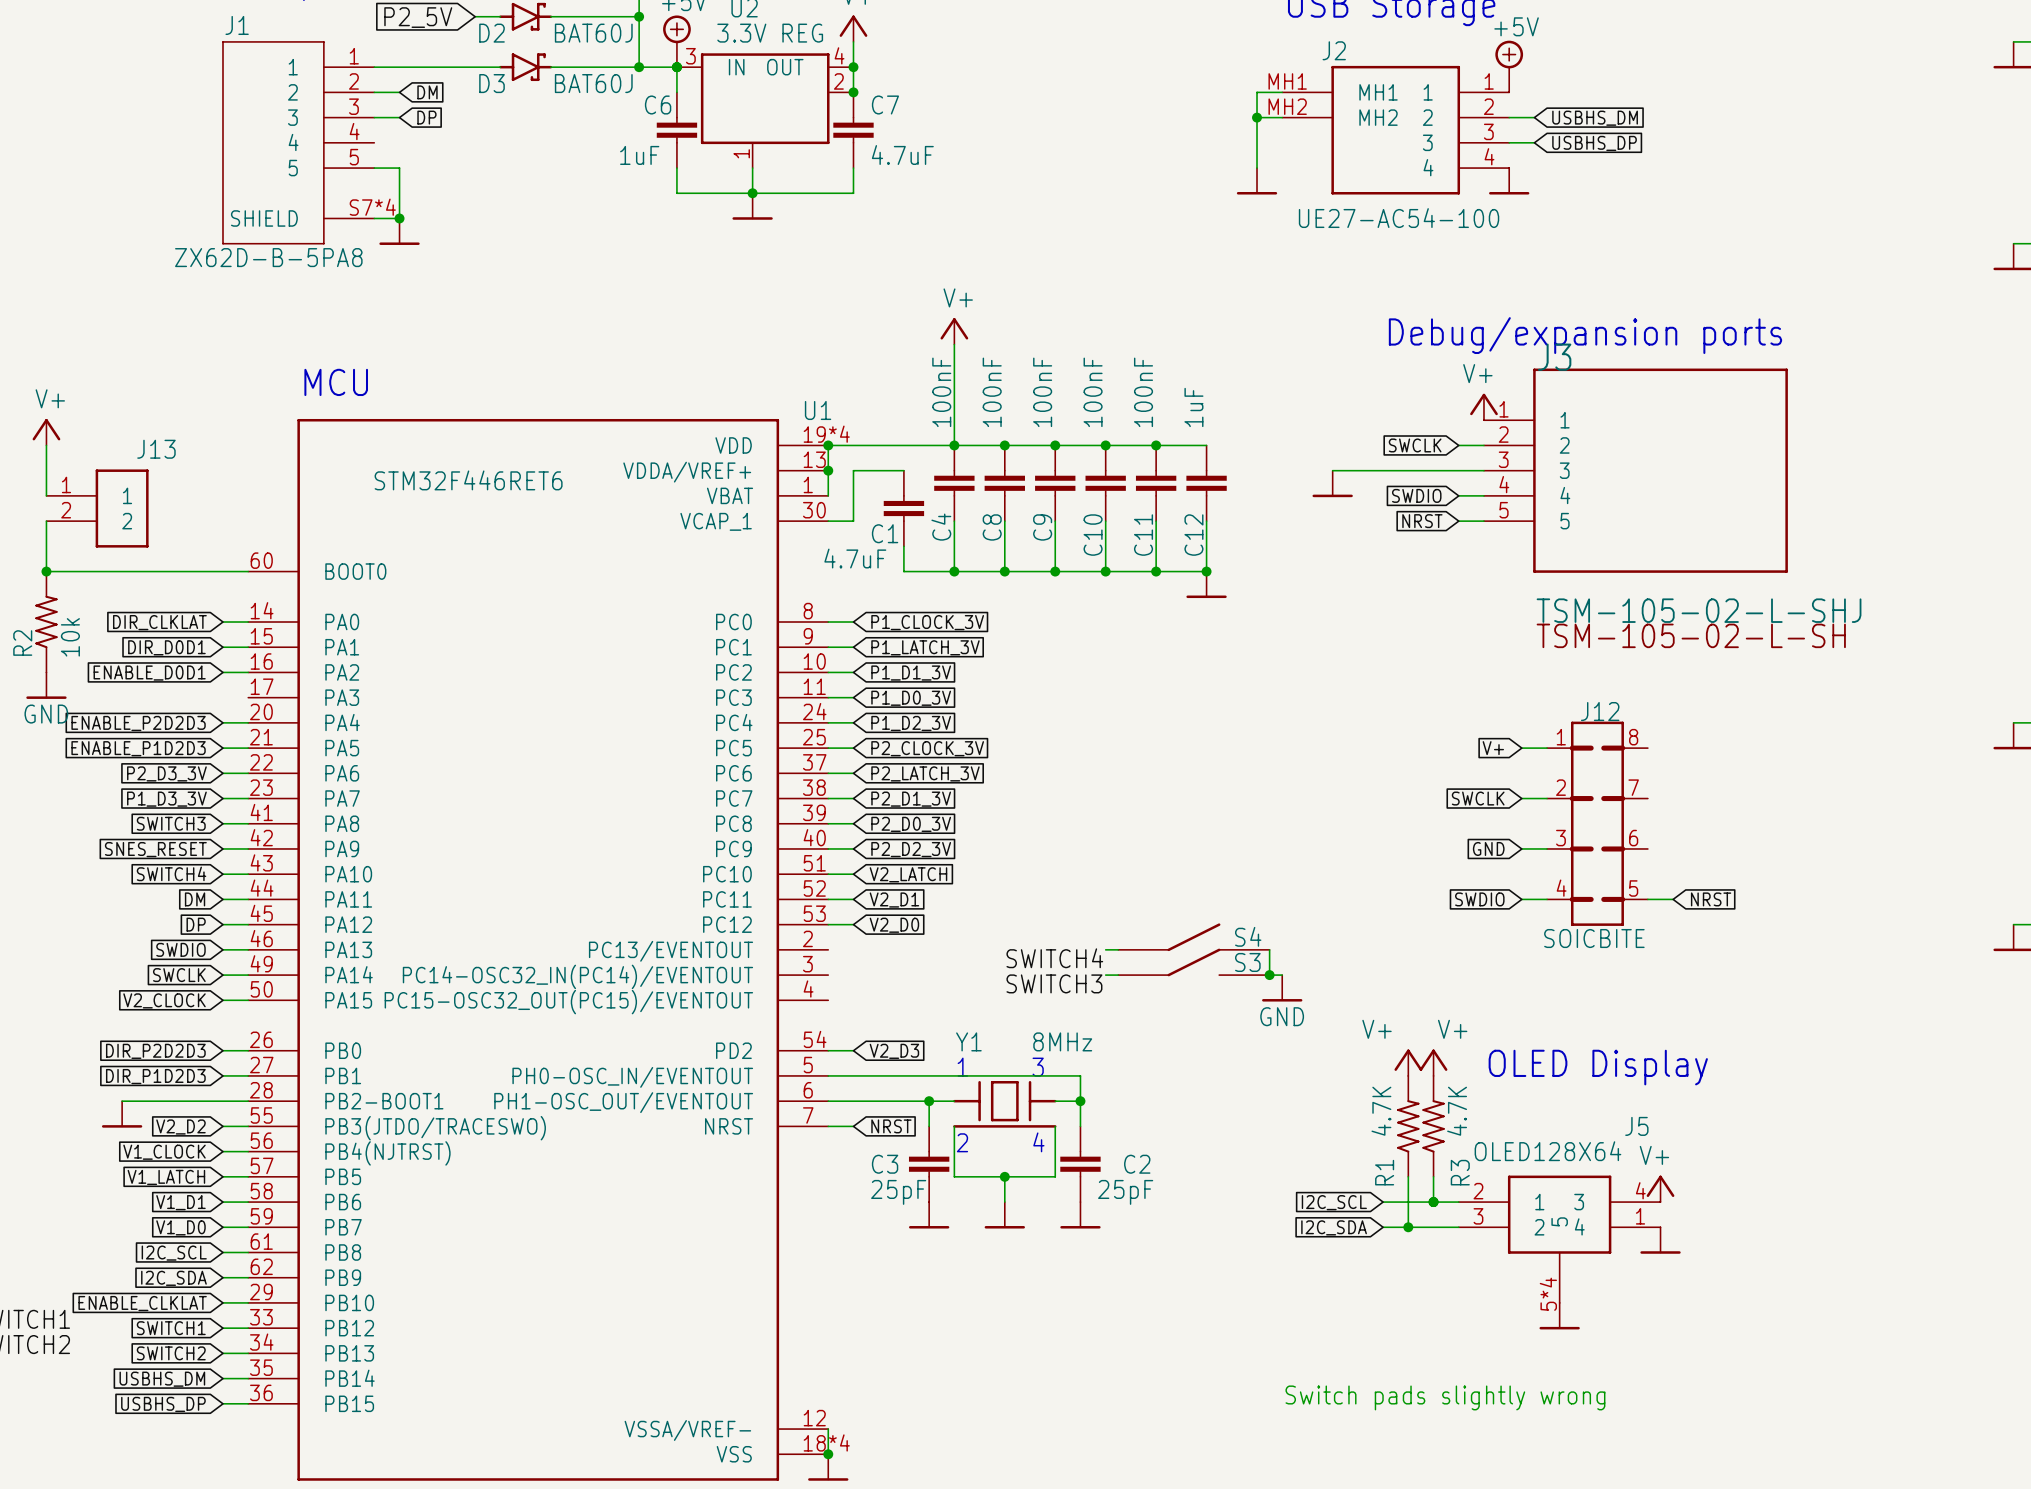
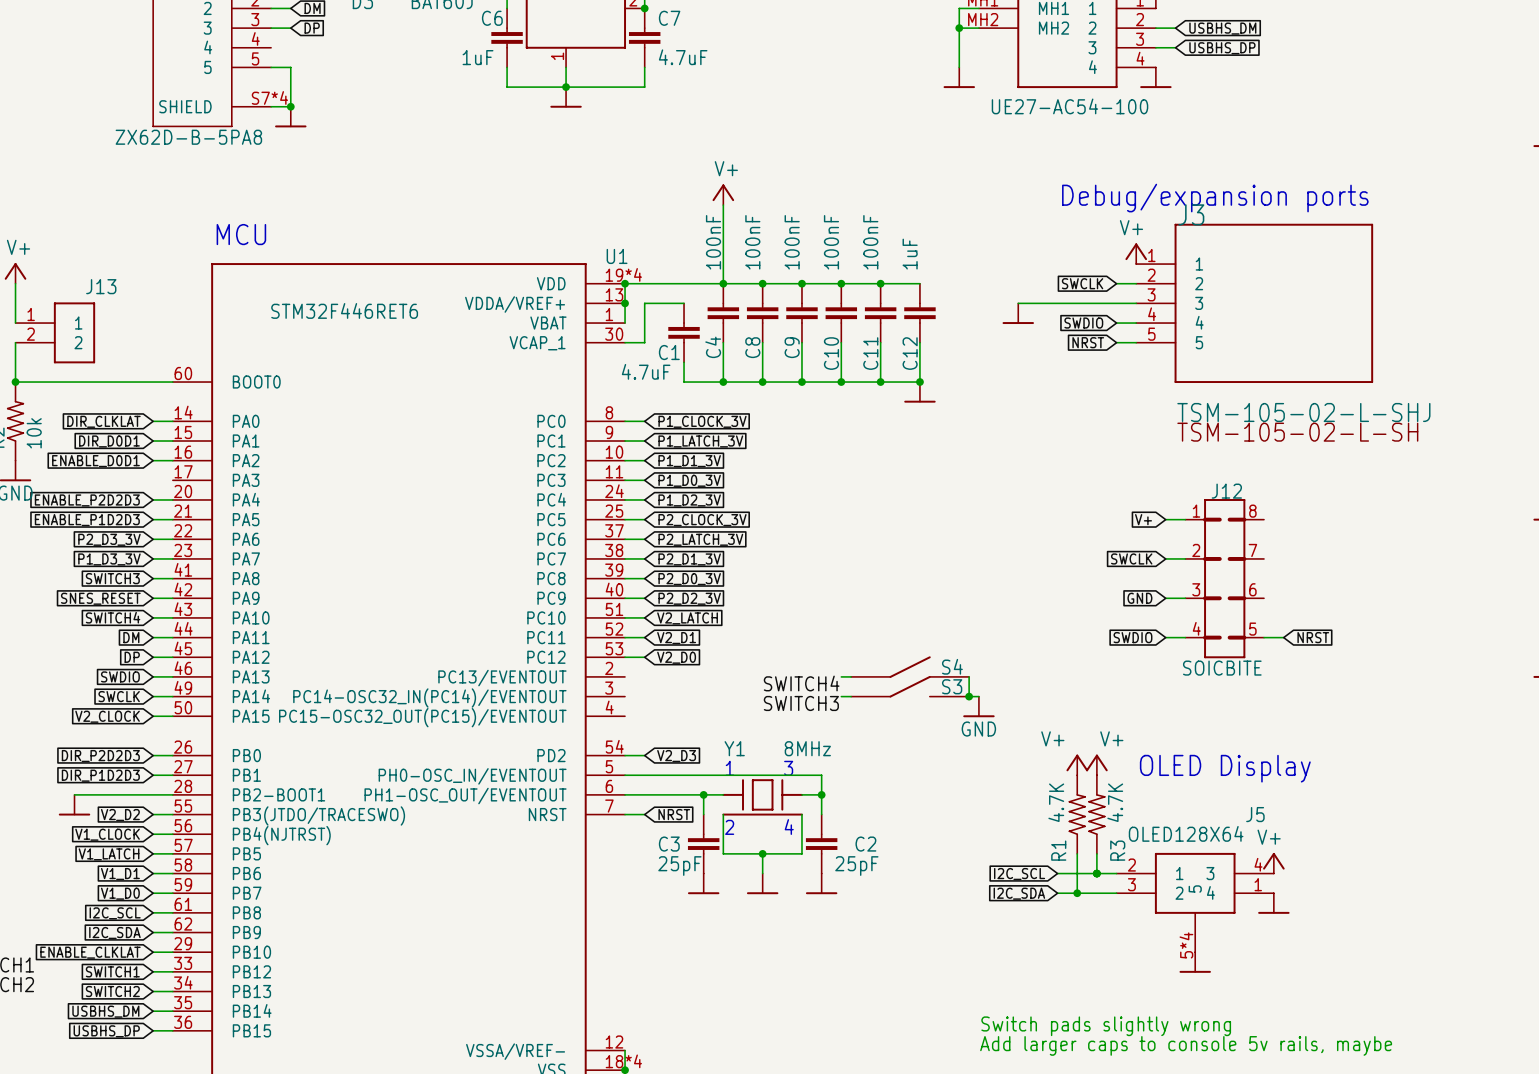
text: none -> Add larger caps to console 5v rails, maybe (1186, 1045)

